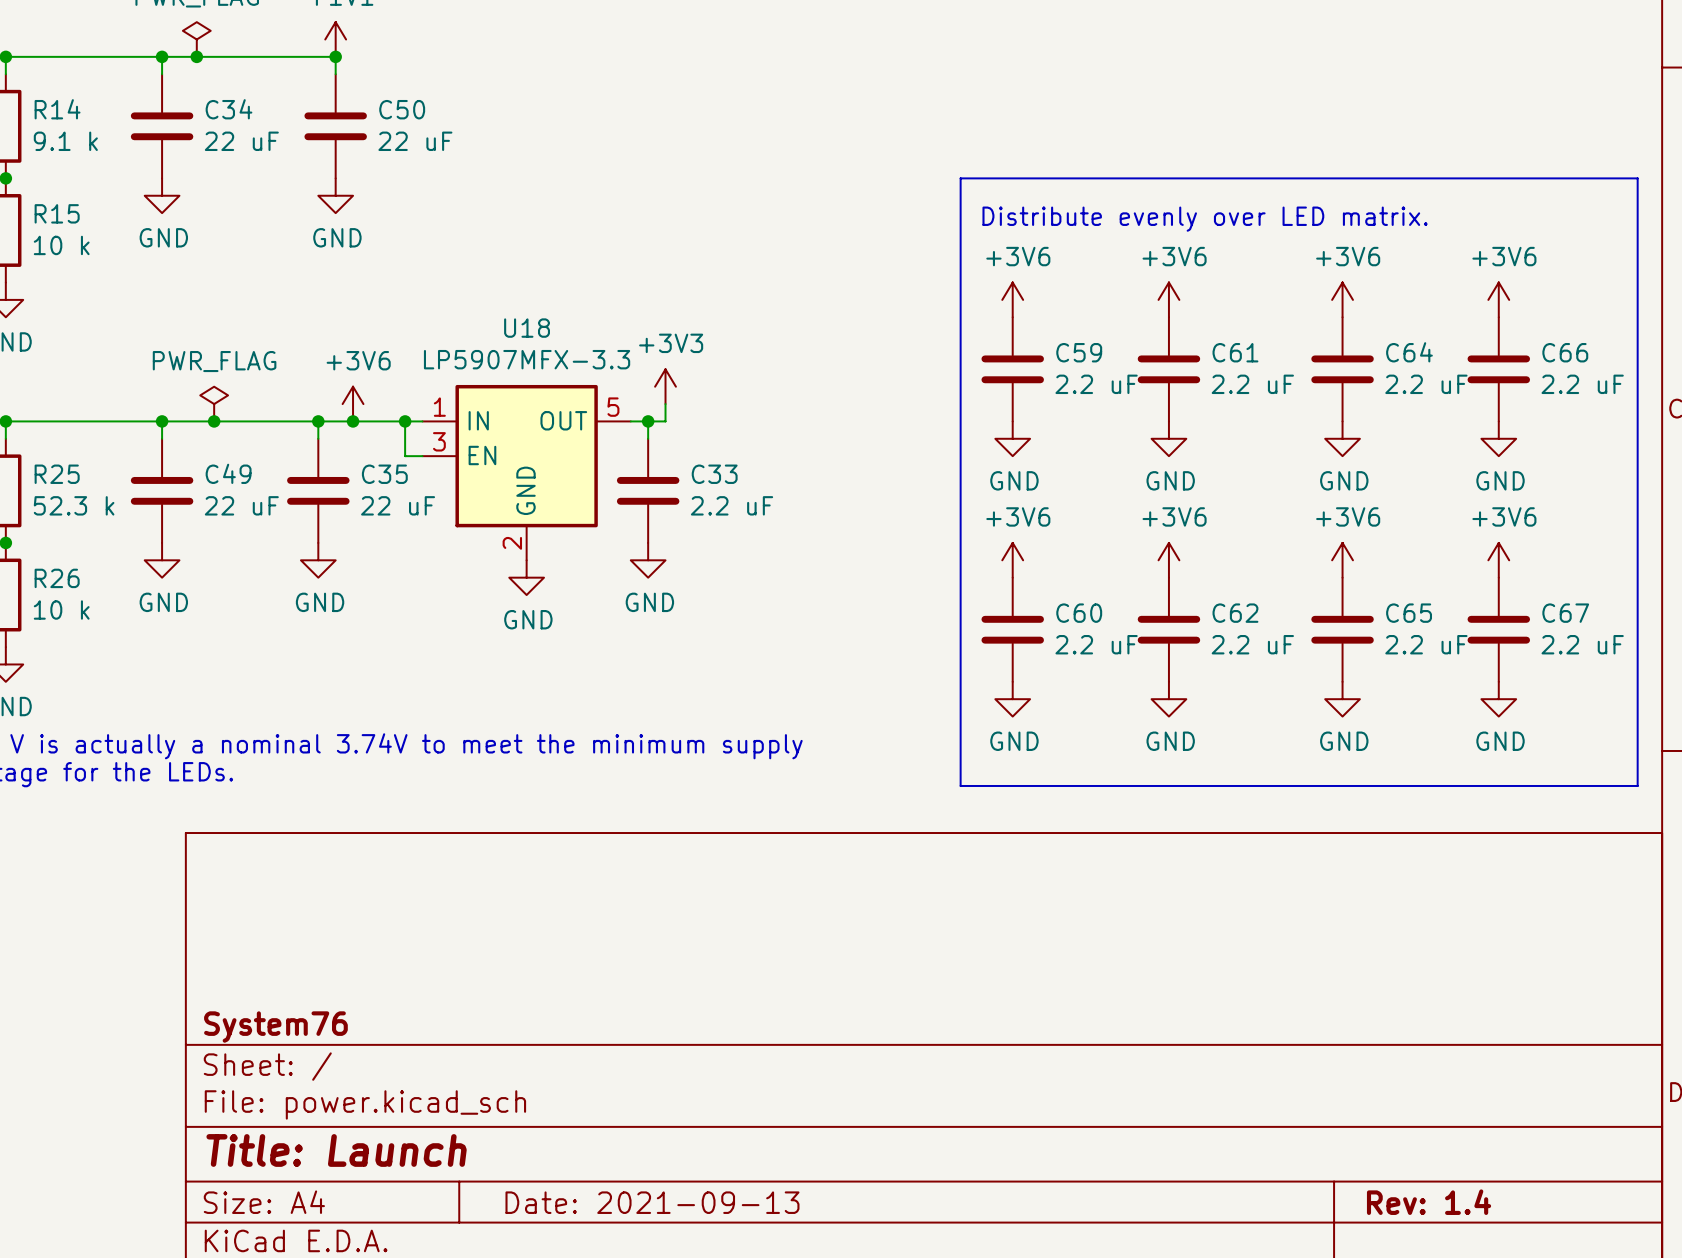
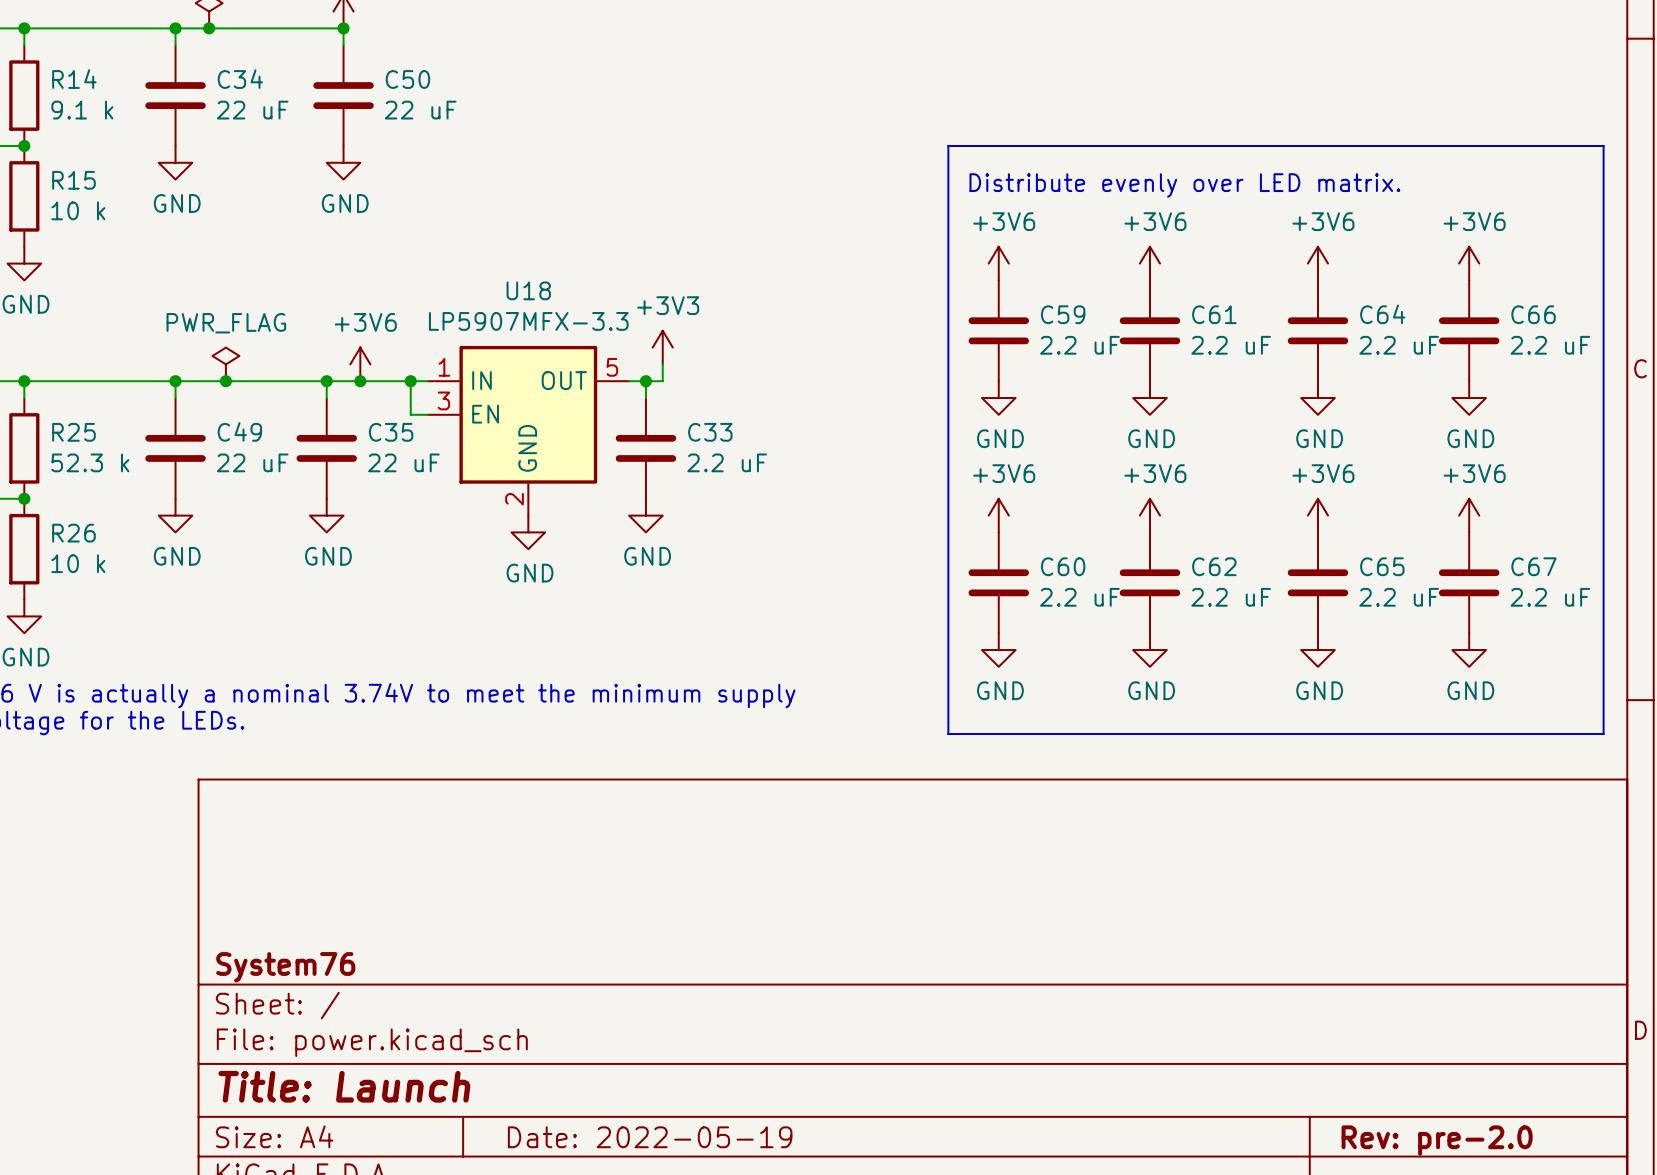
title block: Date: 2021-09-13 (652, 1202) -> Date: 2022-05-19 (650, 1137)
title block: Rev: 1.4 (1429, 1202) -> Rev: pre-2.0 (1437, 1140)

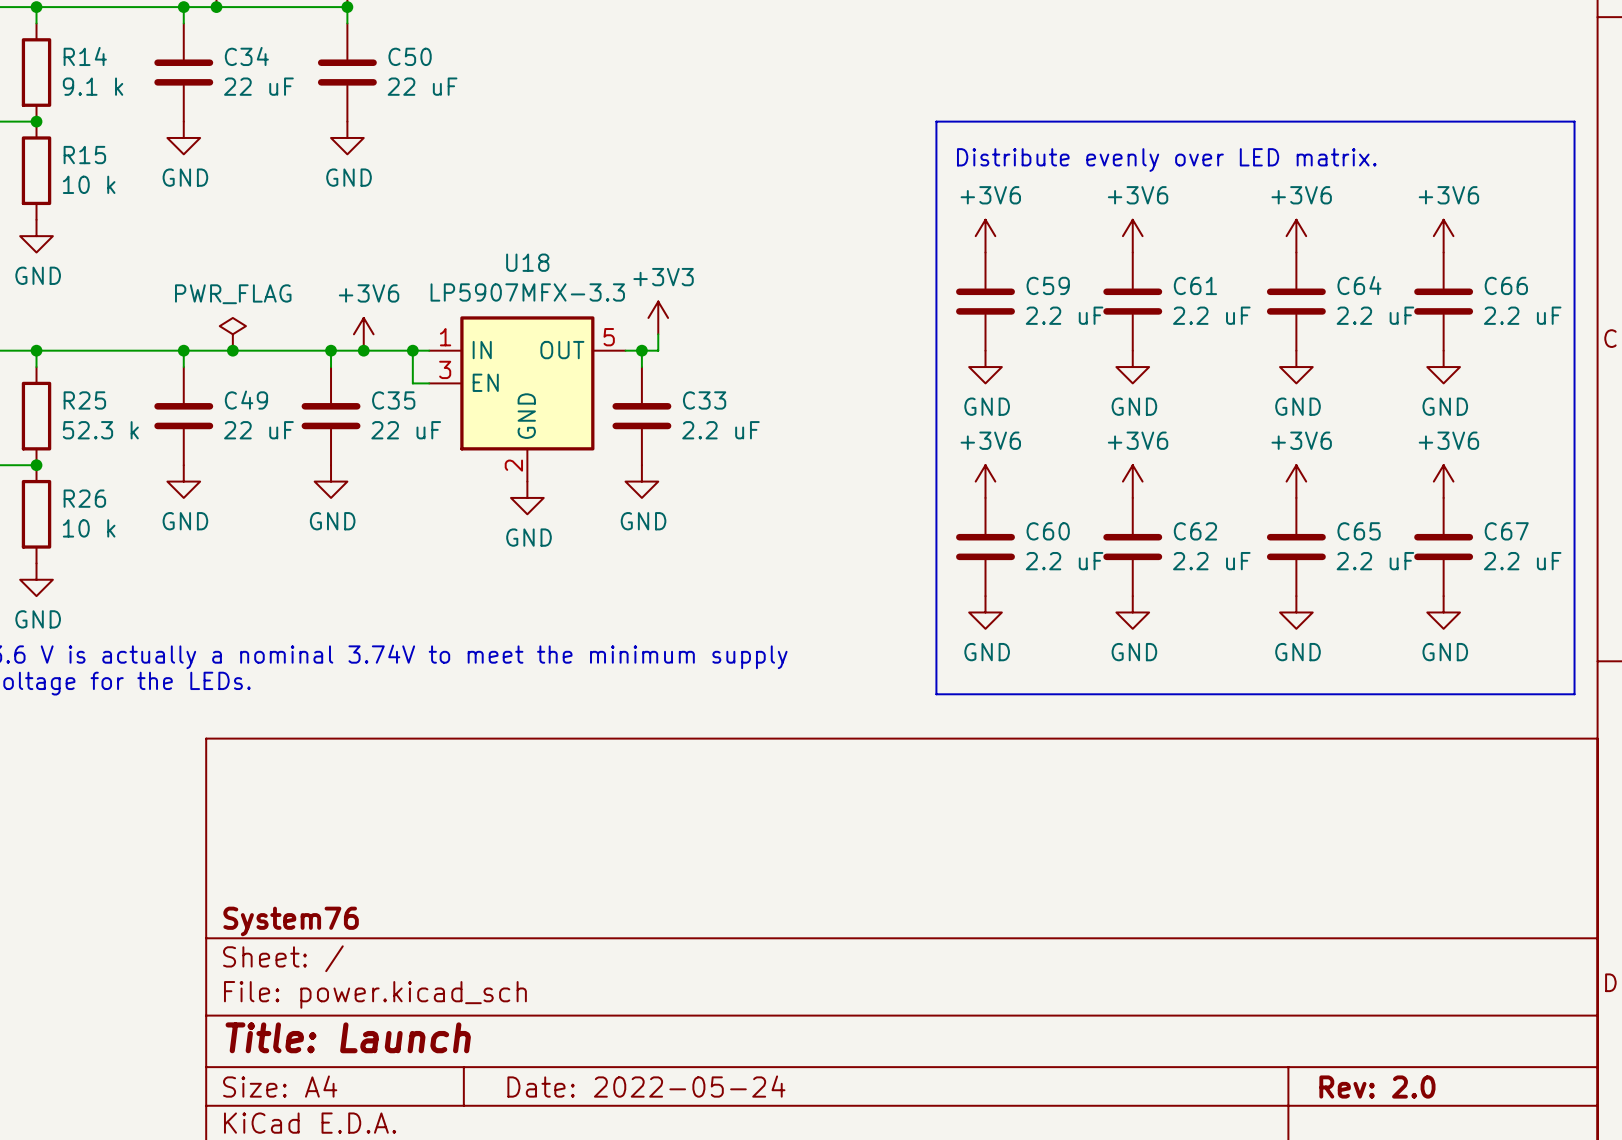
title block: Date: 2022-05-19 (650, 1137) -> Date: 2022-05-24 (646, 1086)
title block: Rev: pre-2.0 (1437, 1140) -> Rev: 2.0 (1377, 1087)

